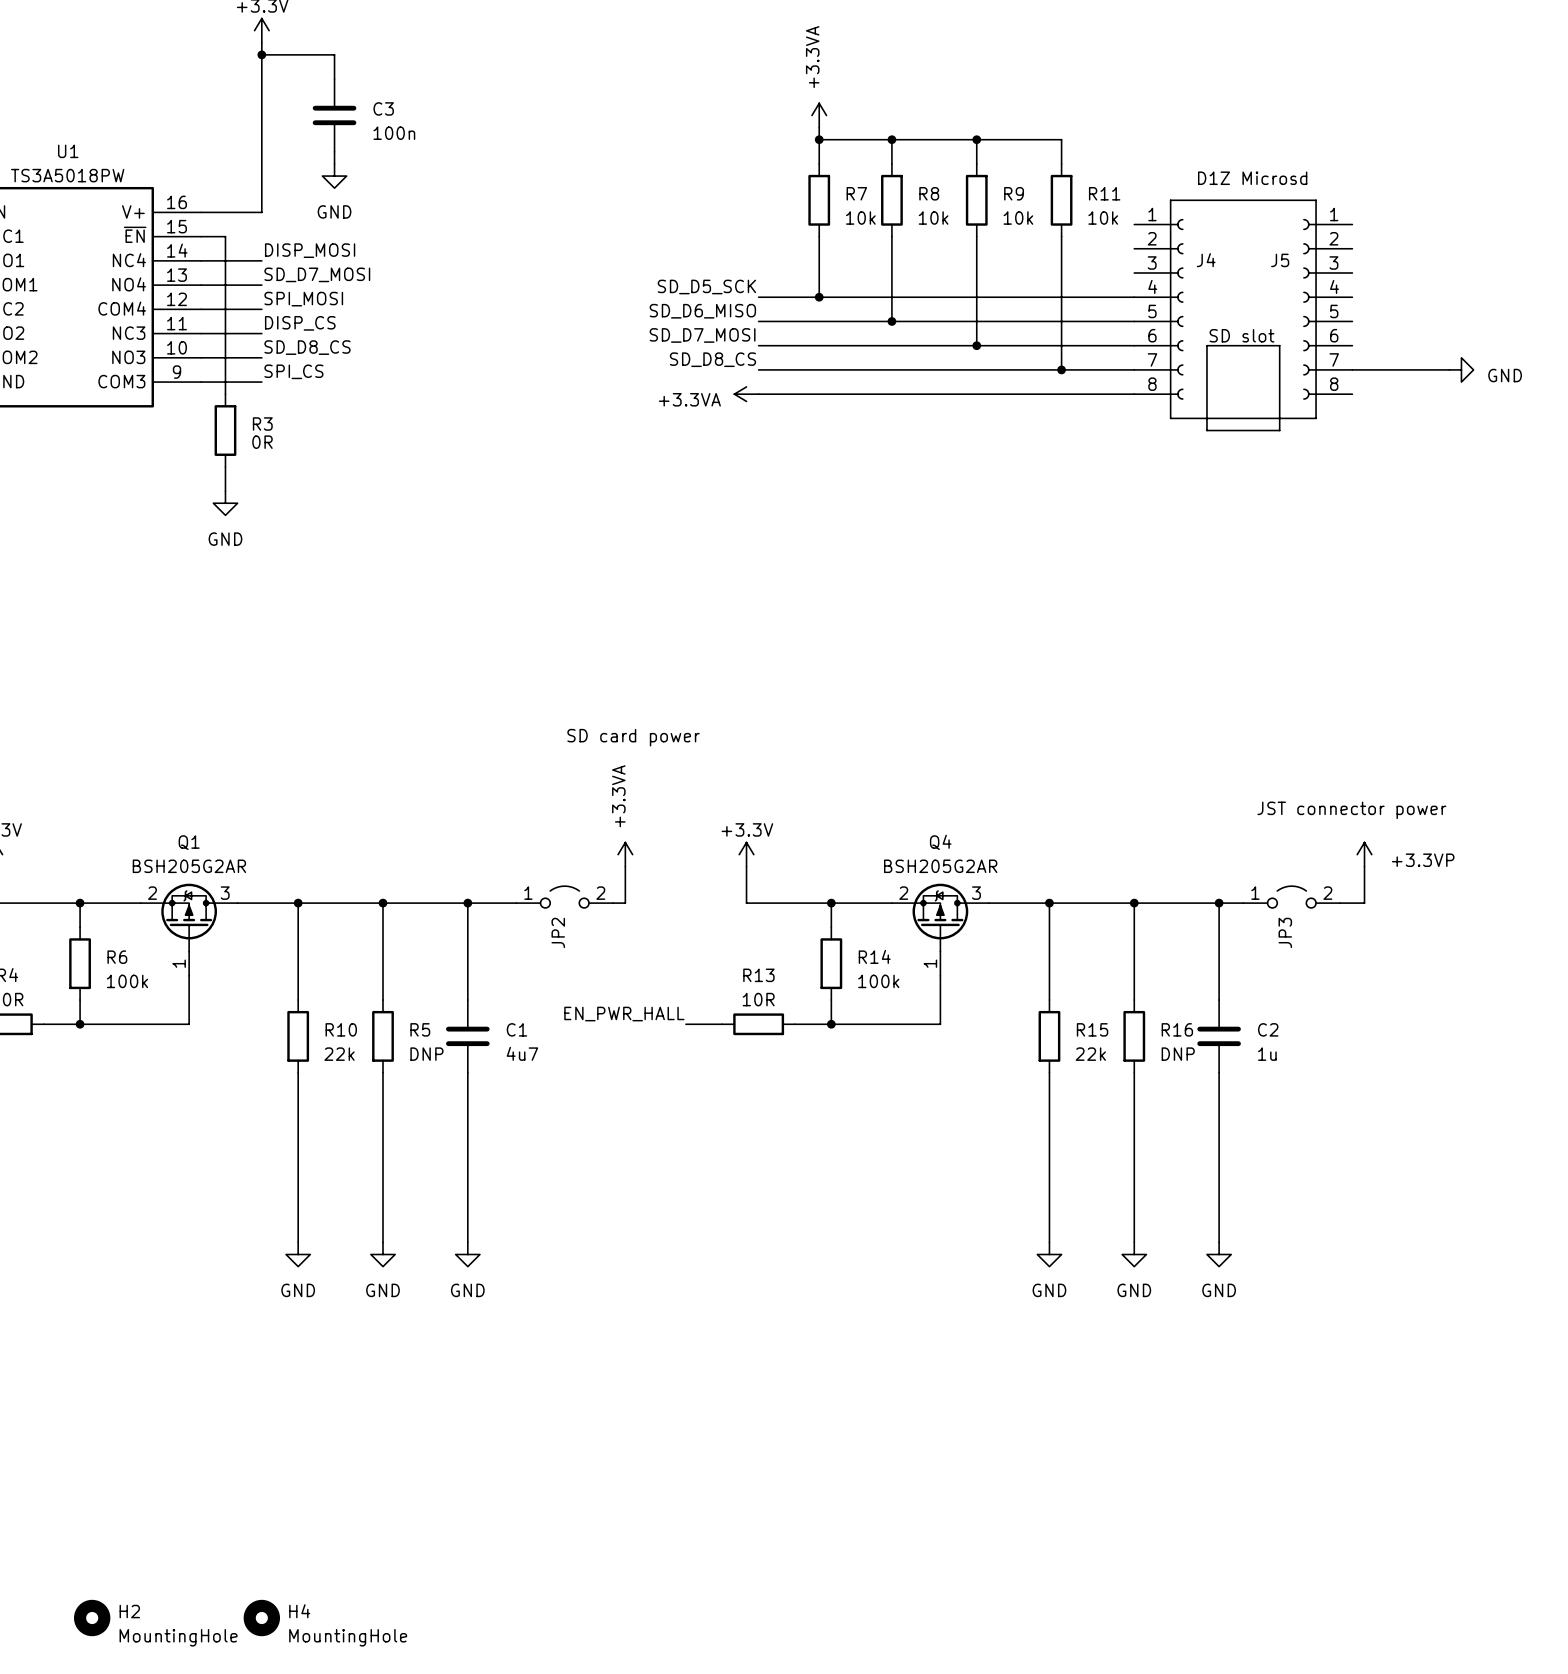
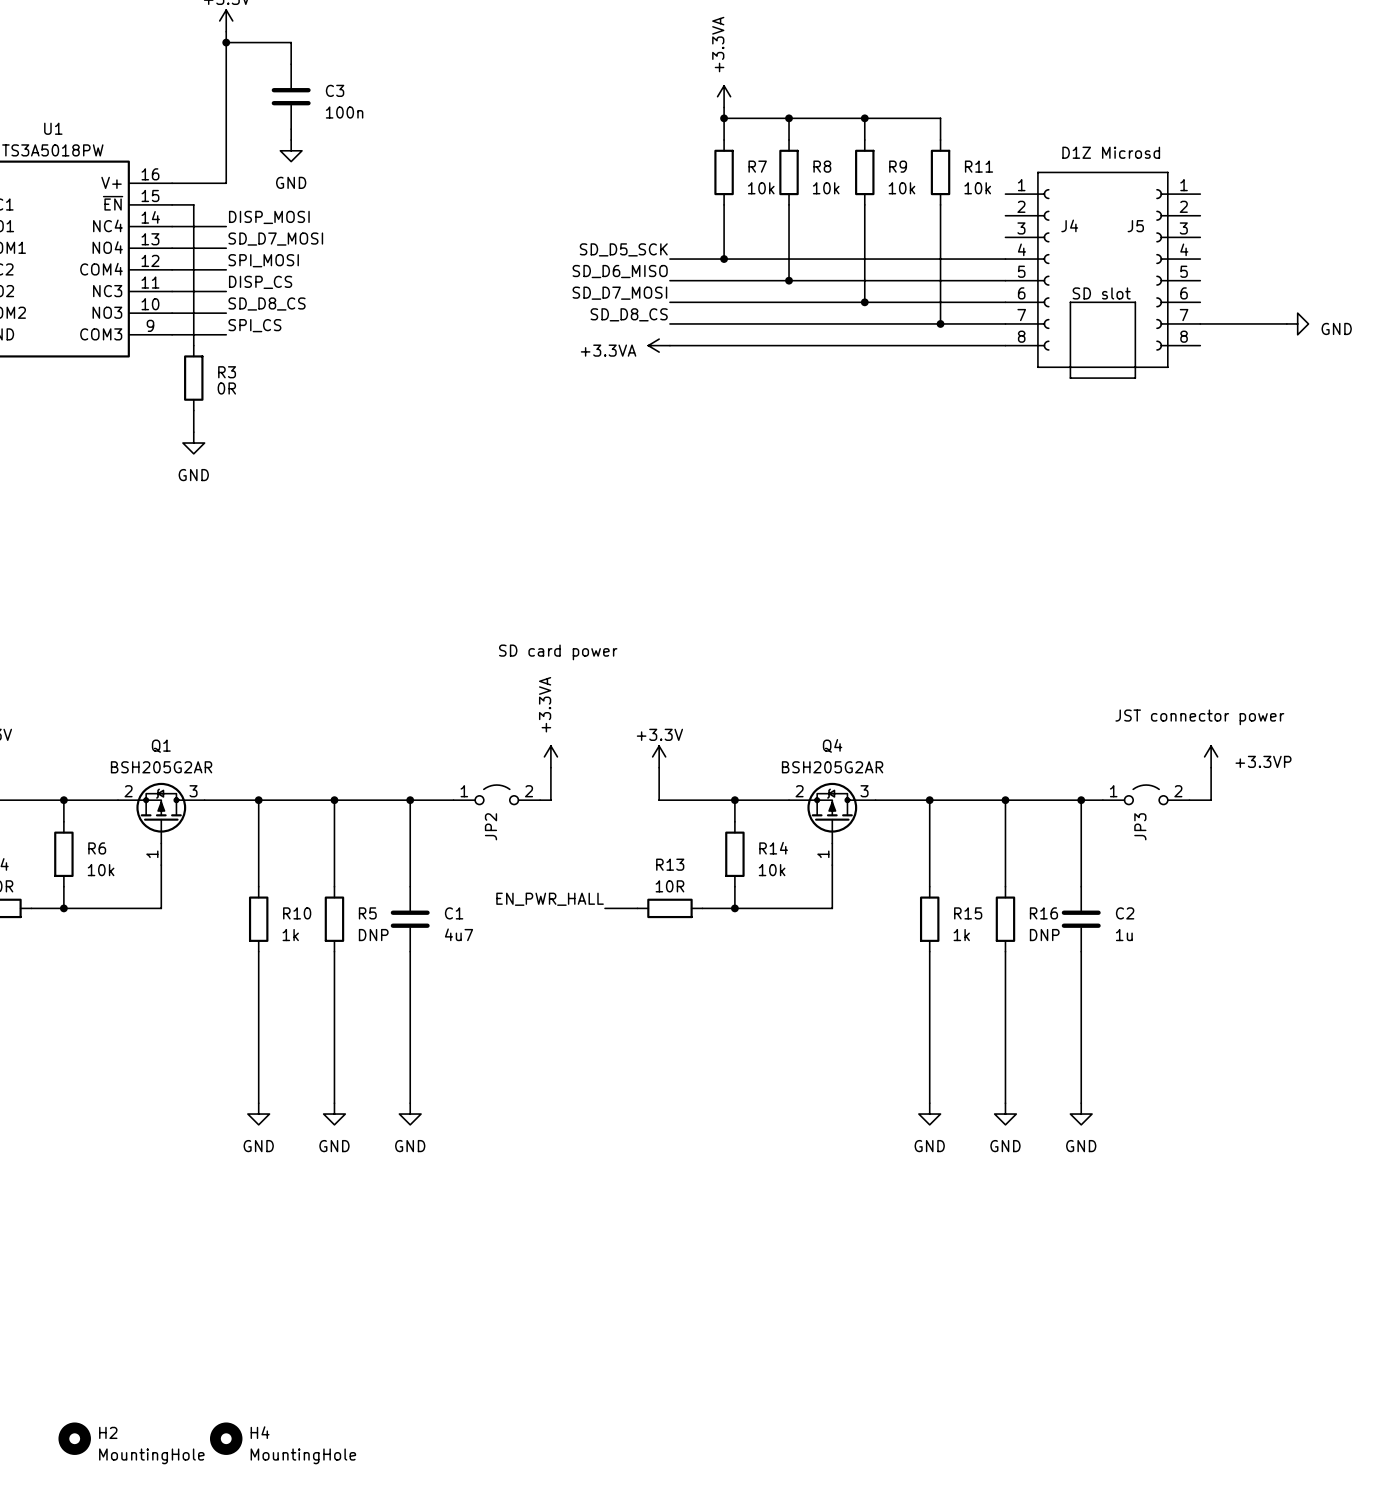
R6 value: 100k (127, 981) -> 10k (101, 870)
R14 value: 100k (878, 981) -> 10k (772, 870)
R10 value: 22k (339, 1054) -> 1k (290, 935)
R15 value: 22k (1090, 1054) -> 1k (961, 935)

